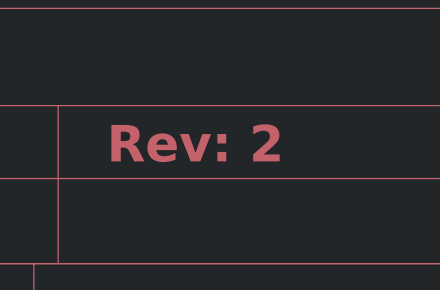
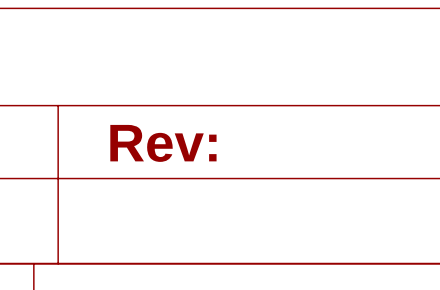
title block: Rev: 2 (195, 143) -> Rev: (163, 143)

